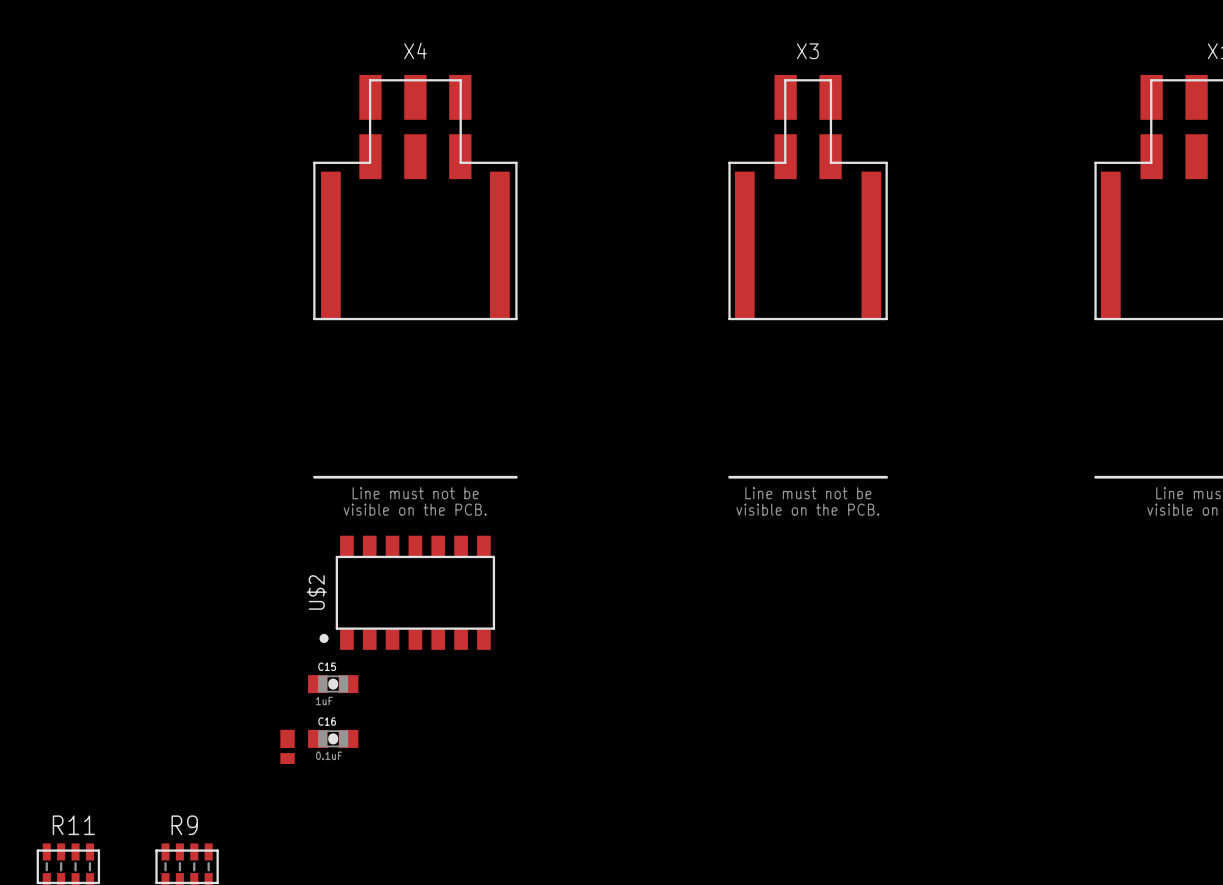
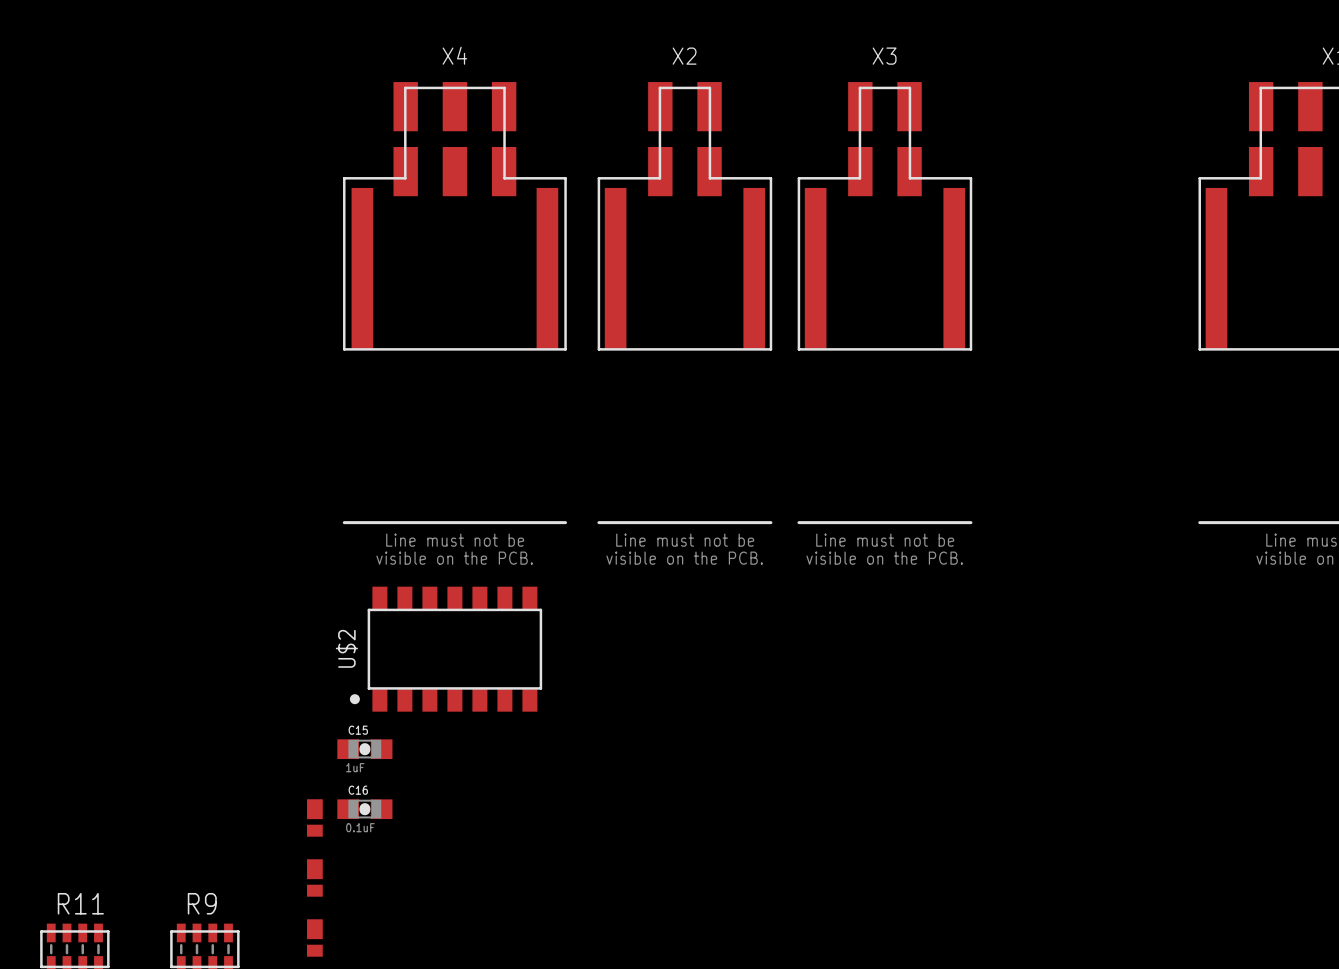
X2: none -> (684, 303)
part: none -> (314, 877)
part: none -> (314, 937)

